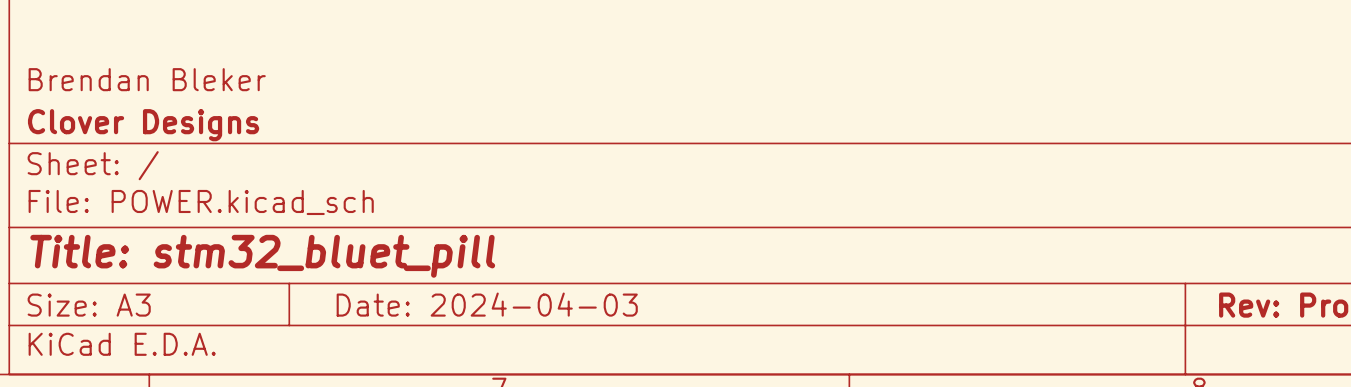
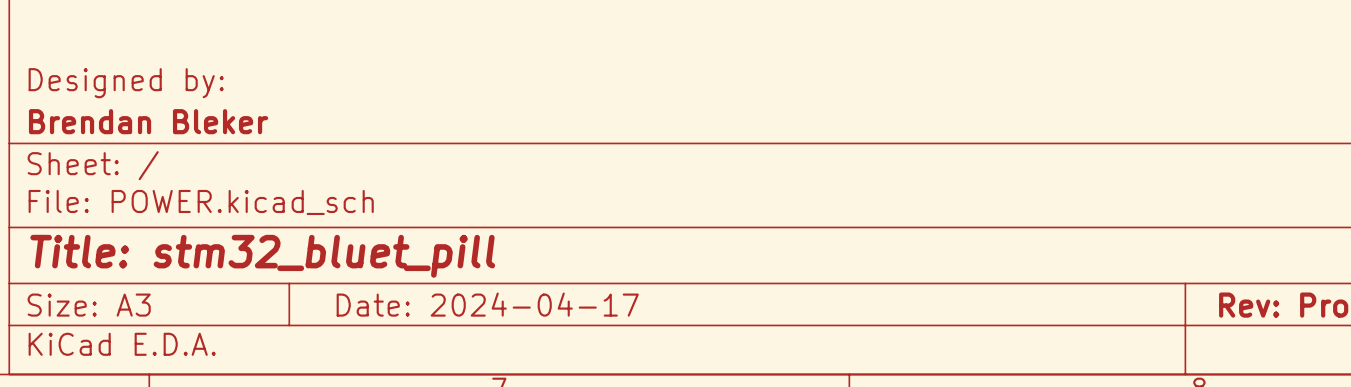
title block: Brendan Bleker (147, 79) -> Designed by: (126, 83)
title block: Clover Designs (143, 125) -> Brendan Bleker (148, 121)
title block: Date: 2024-04-03 (487, 304) -> Date: 2024-04-17 (487, 304)

